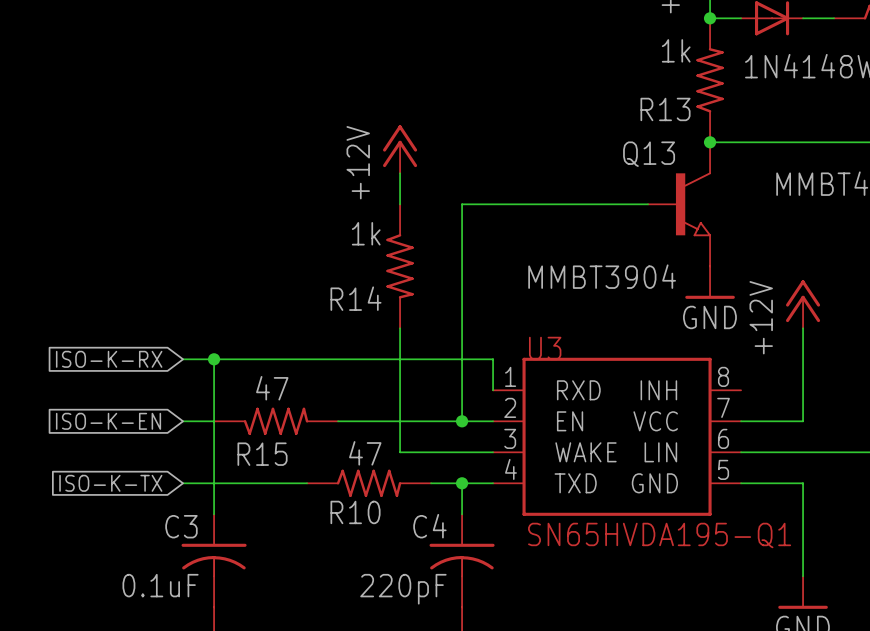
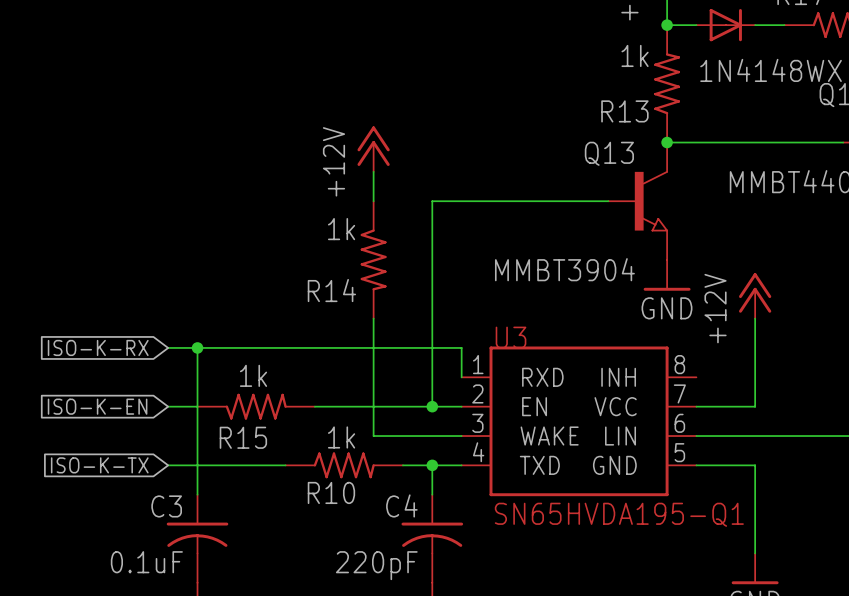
R15 value: 47 (272, 388) -> 1k (253, 375)
R10 value: 47 (365, 453) -> 1k (341, 437)

